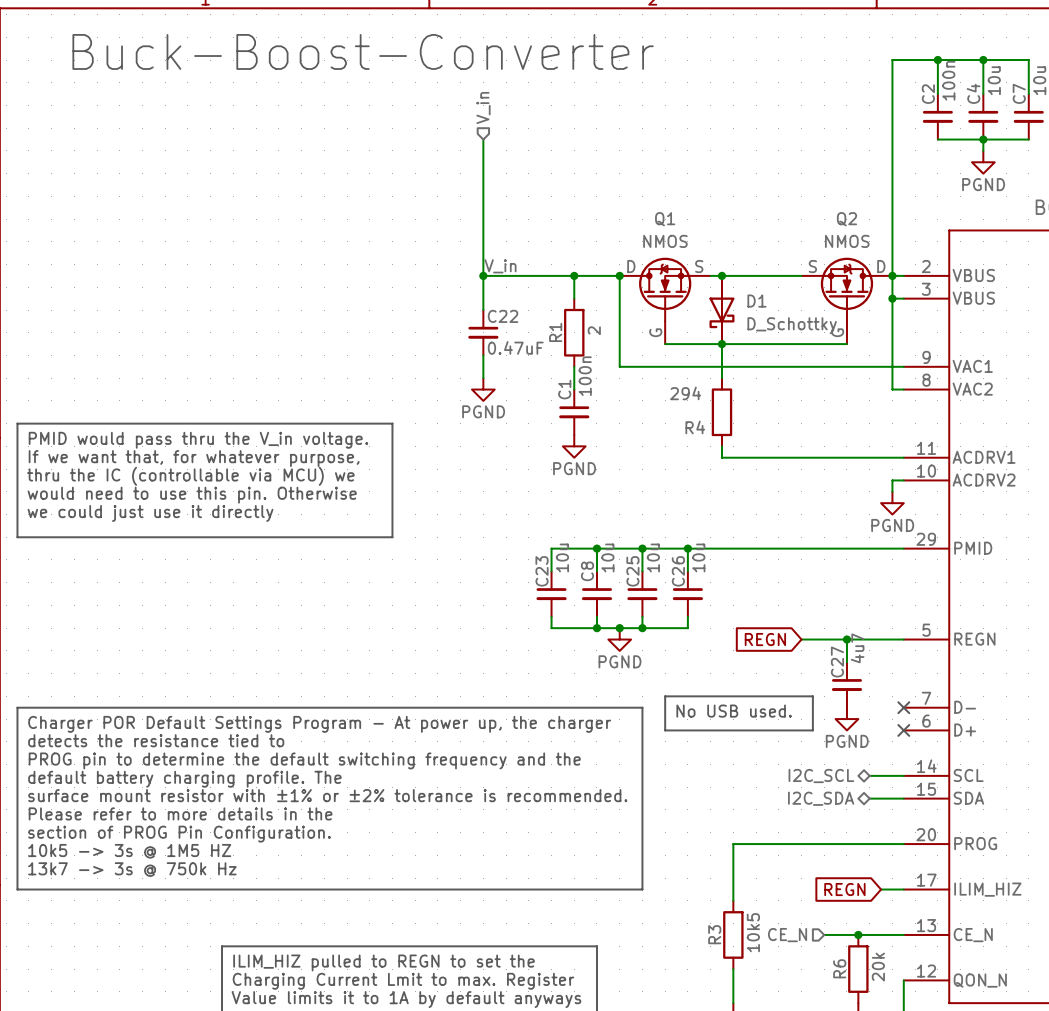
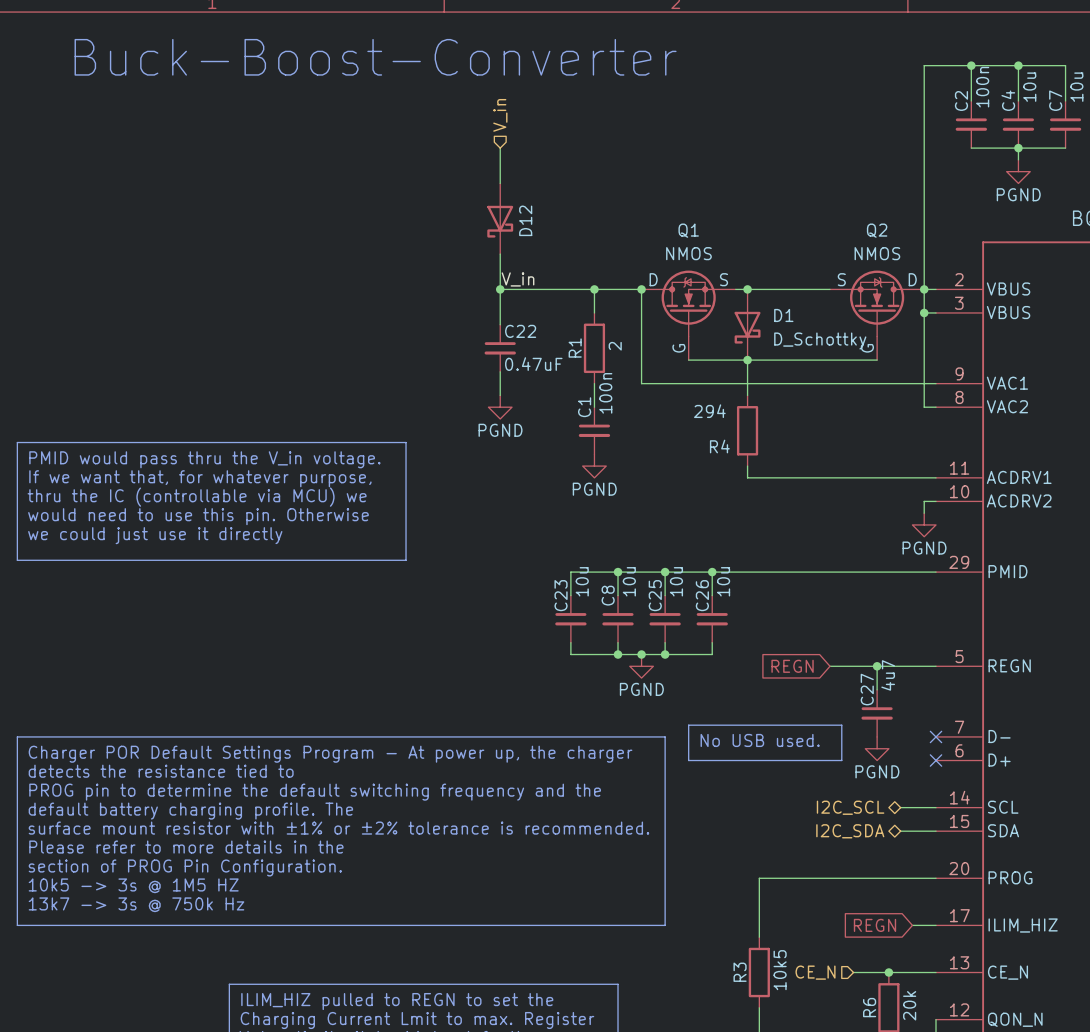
D12: none -> (500, 218)

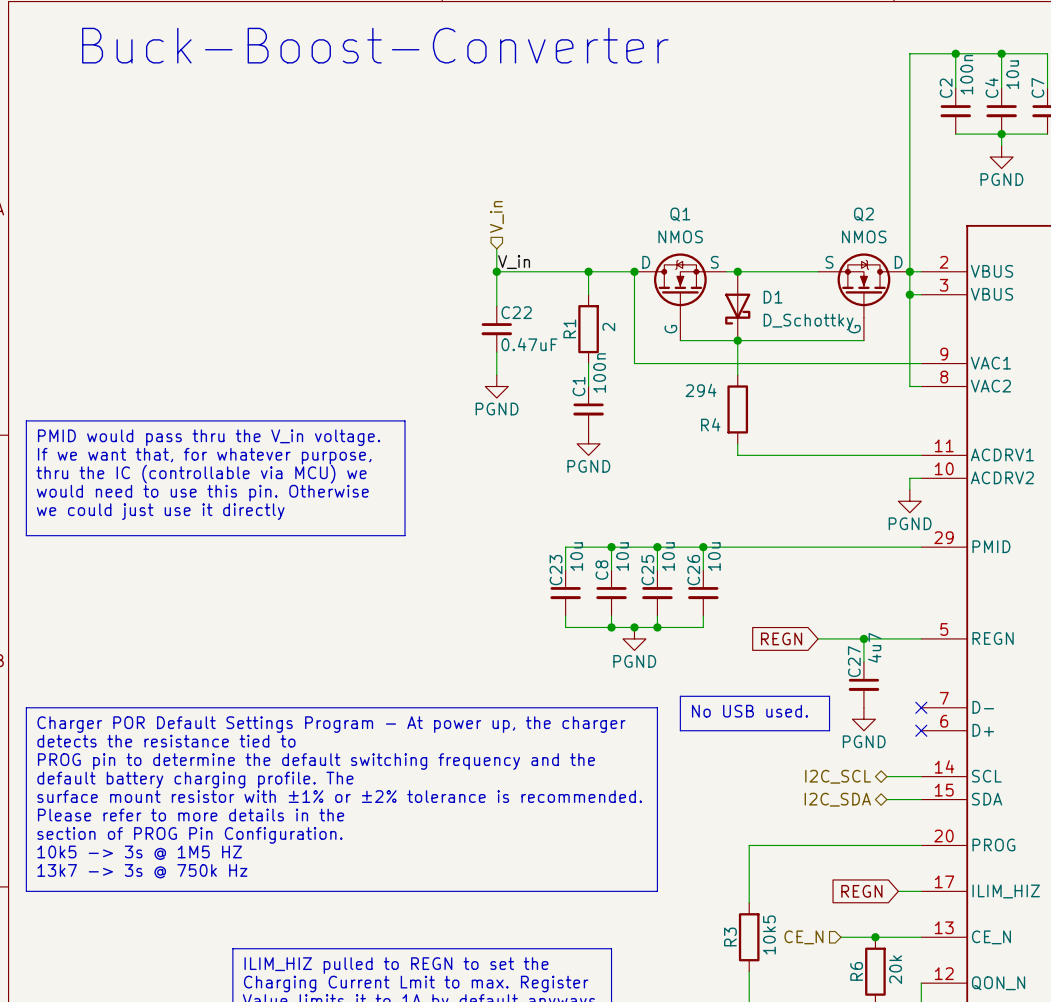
hierarchical label position: V_in (500, 115) -> V_in (496, 216)
wire: (500, 148) (500, 183) -> none
D12: (500, 218) -> none
wire: (500, 254) (500, 265) -> none

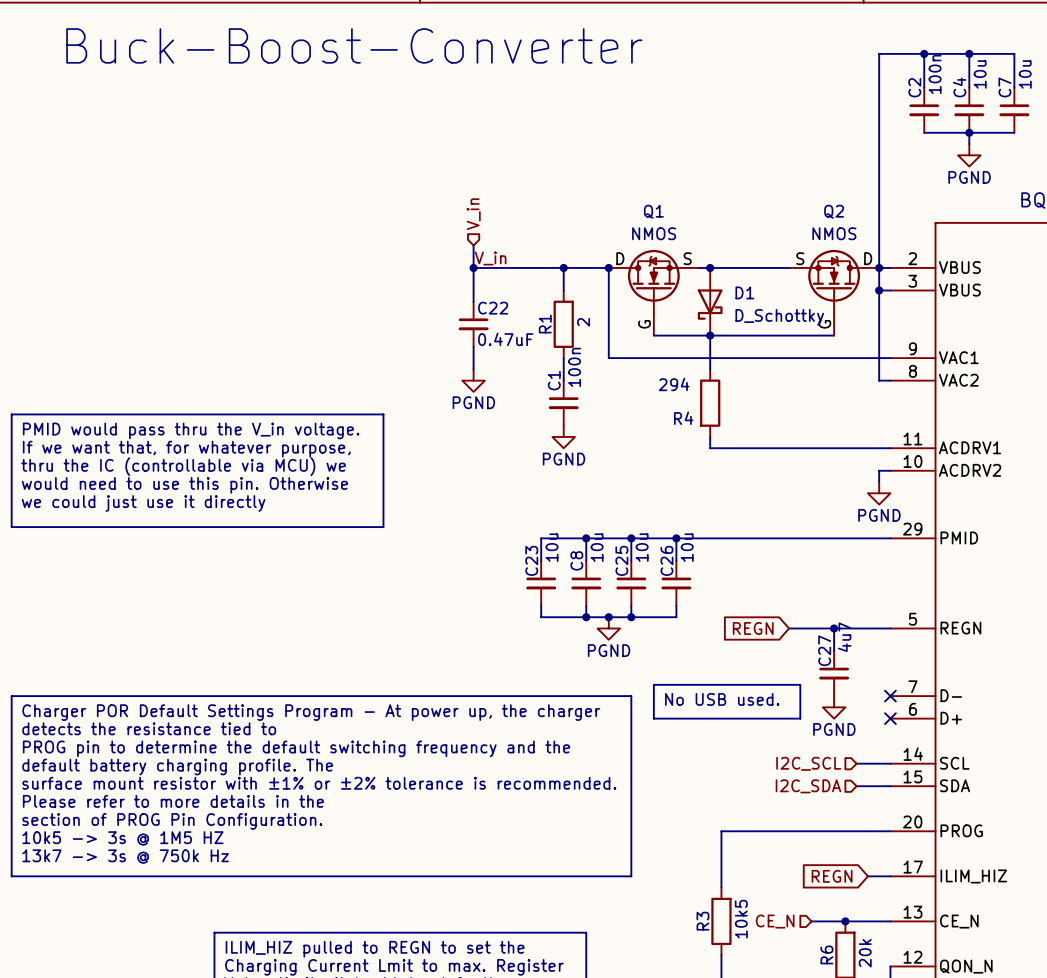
hierarchical label shape: bidirectional (838, 776) -> input (808, 763)
hierarchical label shape: bidirectional (837, 799) -> input (808, 786)

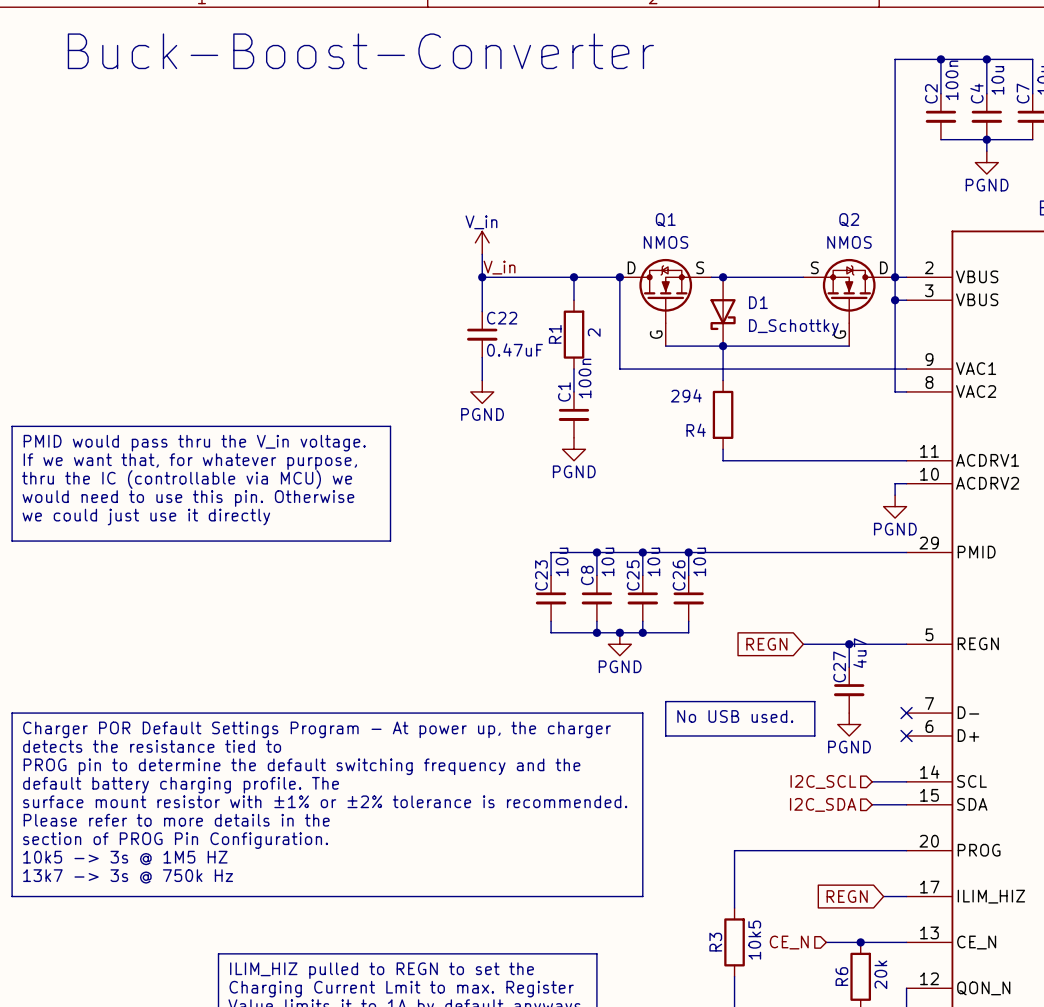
hierarchical label: V_in (473, 214) -> none
power symbol: none -> V_in (482, 242)

